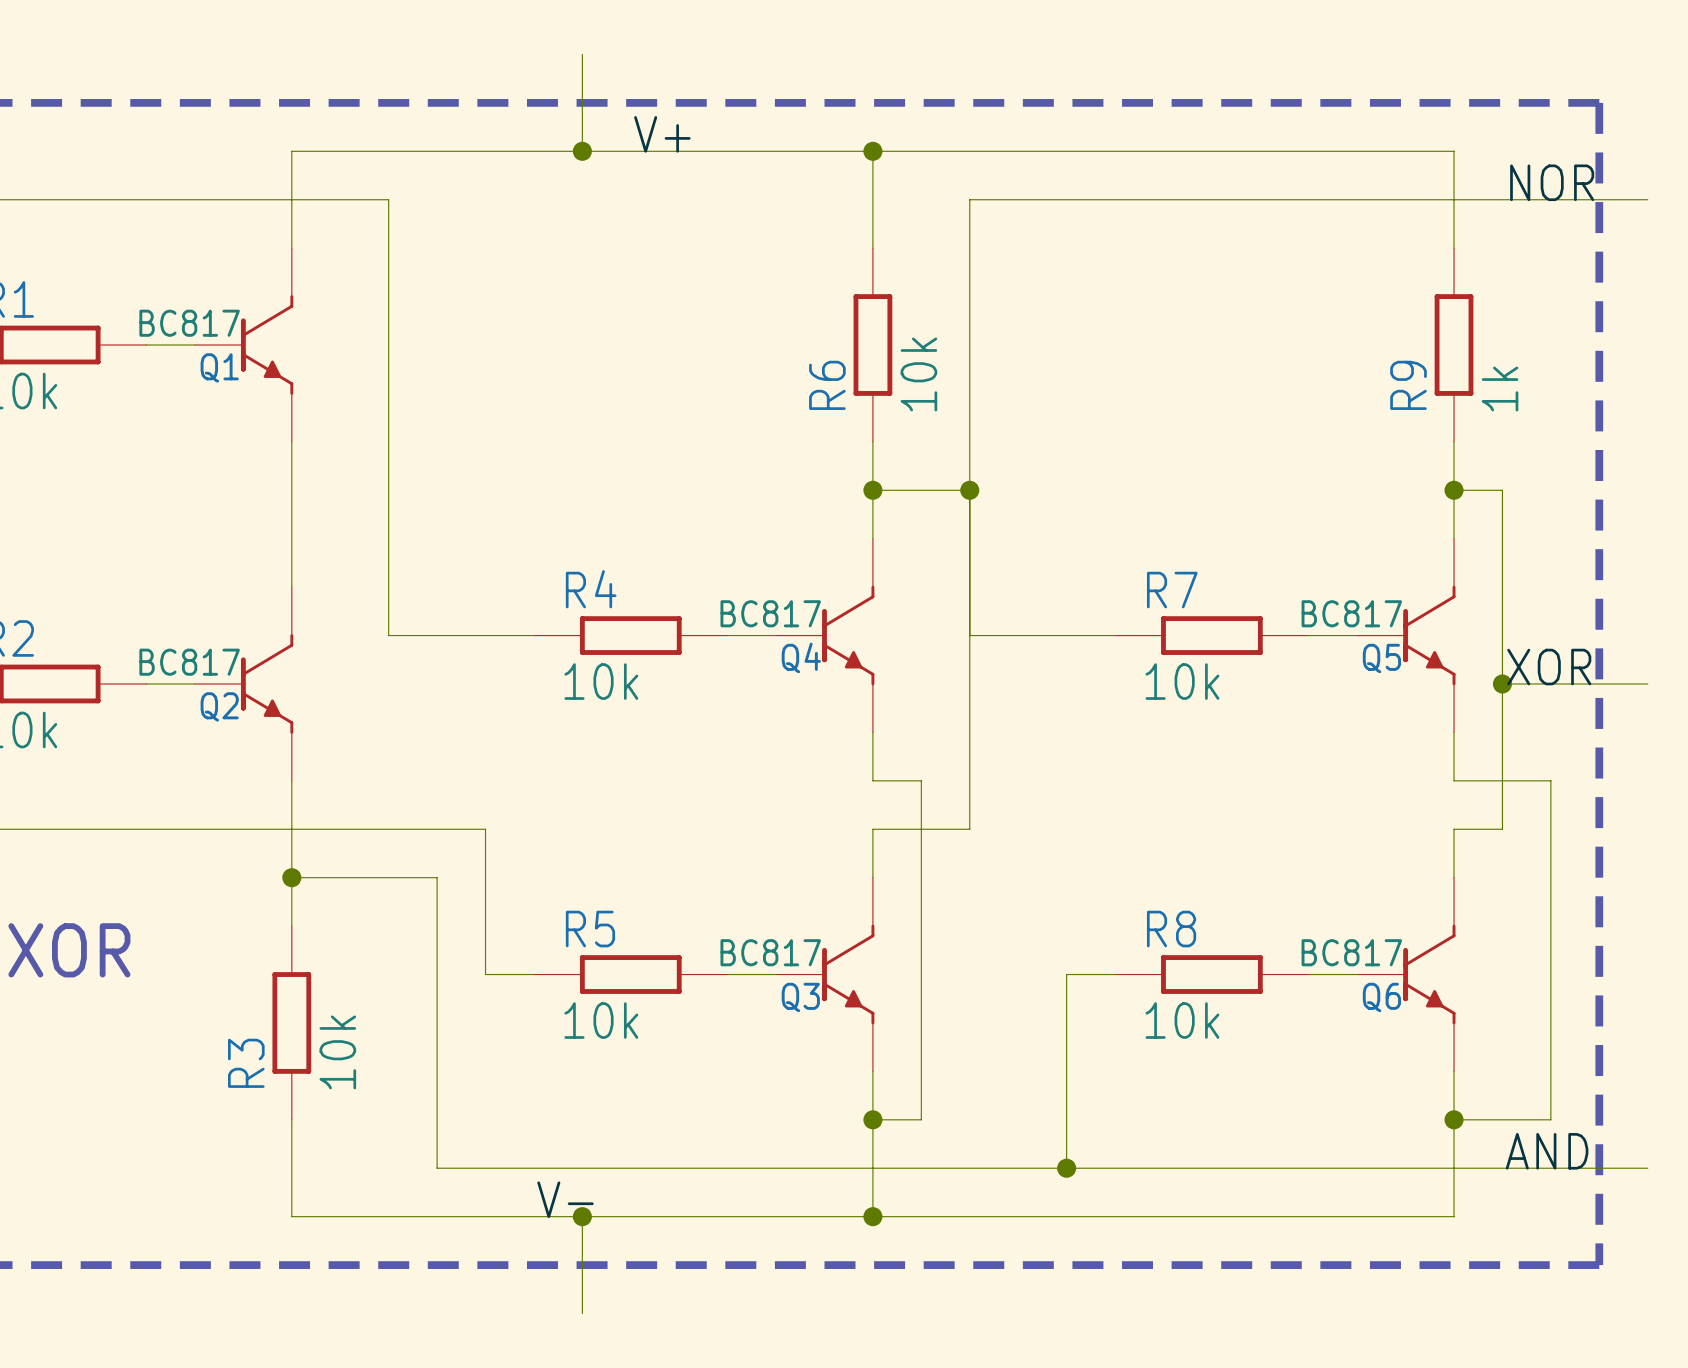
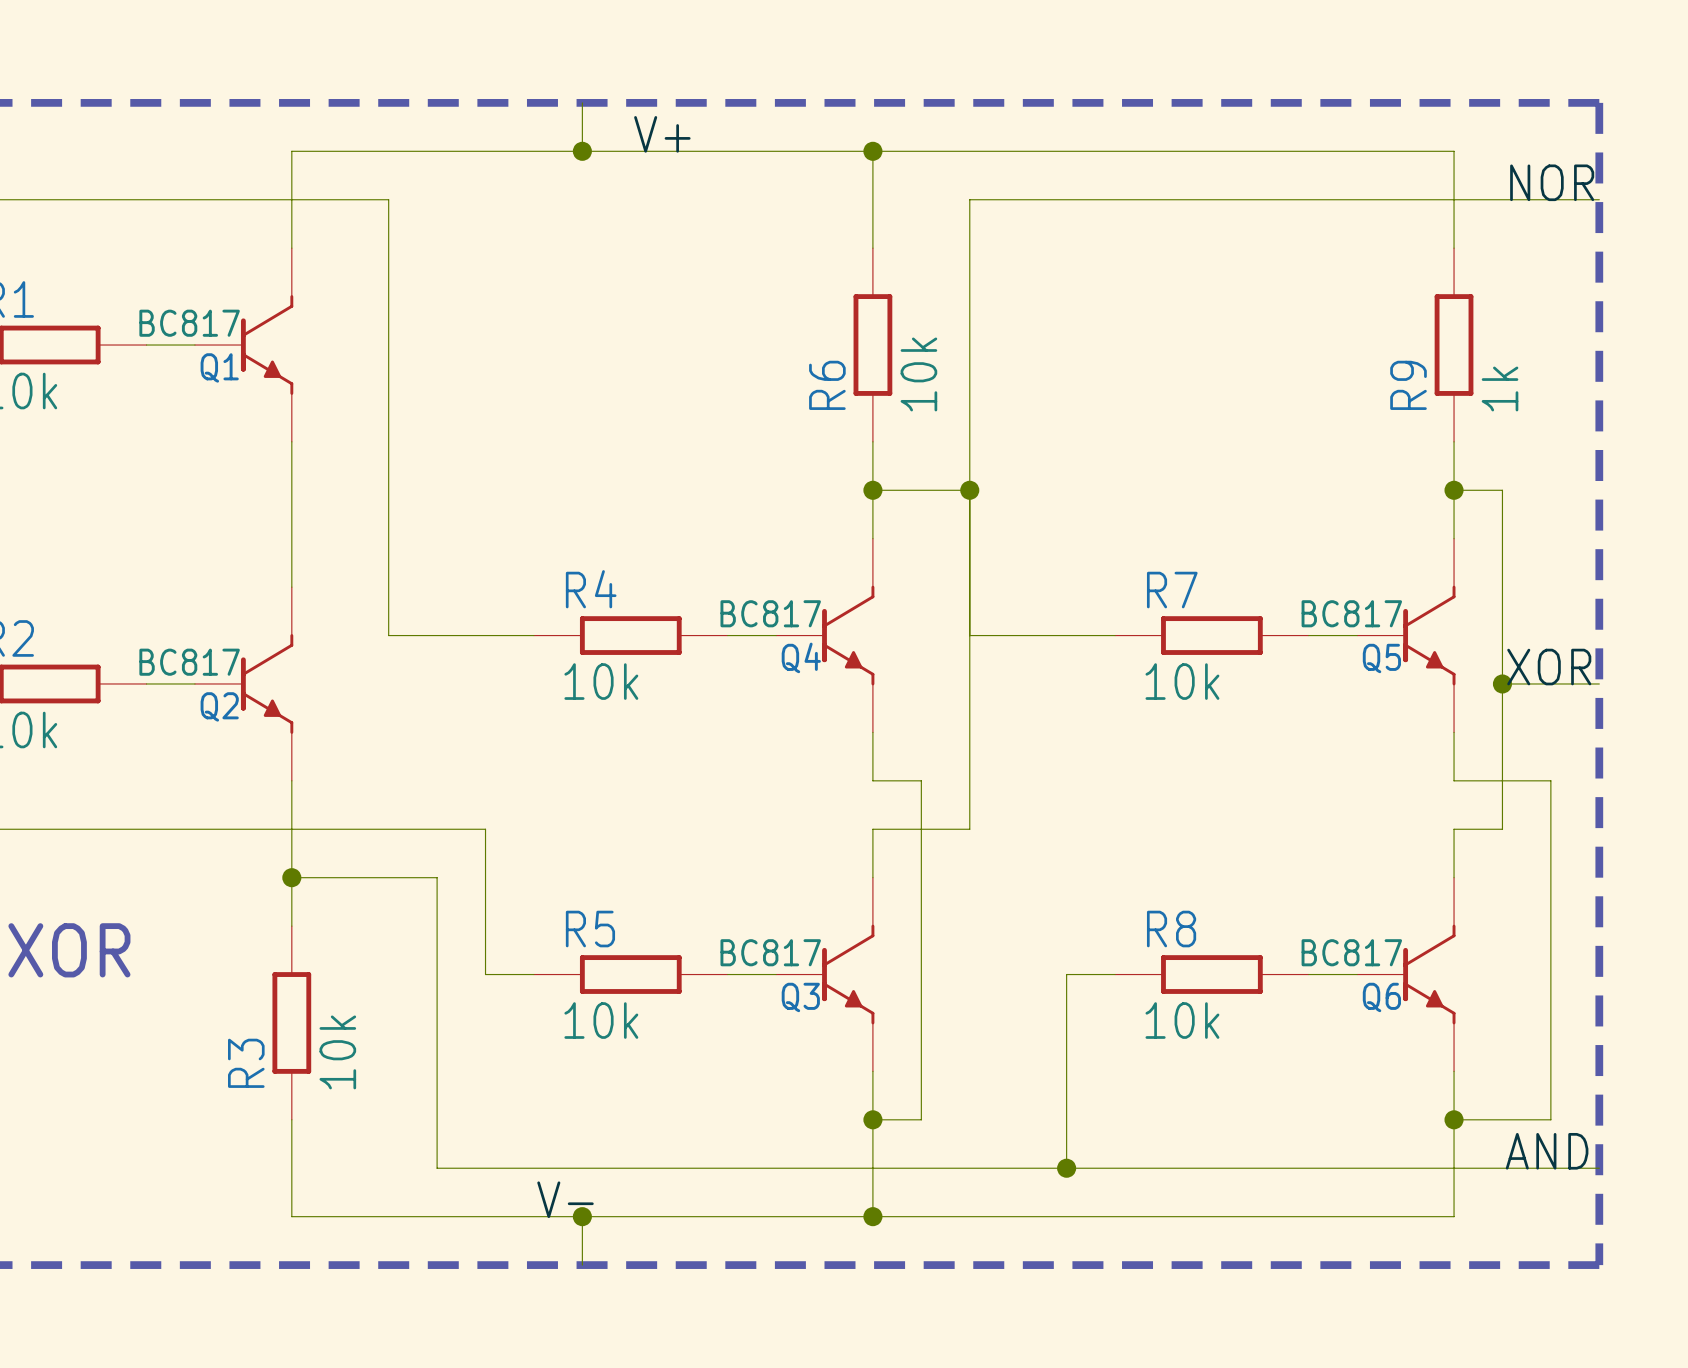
wire: (582, 54) (582, 102) -> none
wire: (1599, 199) (1647, 199) -> none
wire: (1599, 683) (1647, 683) -> none
wire: (1599, 1168) (1647, 1168) -> none
wire: (582, 1265) (582, 1313) -> none

